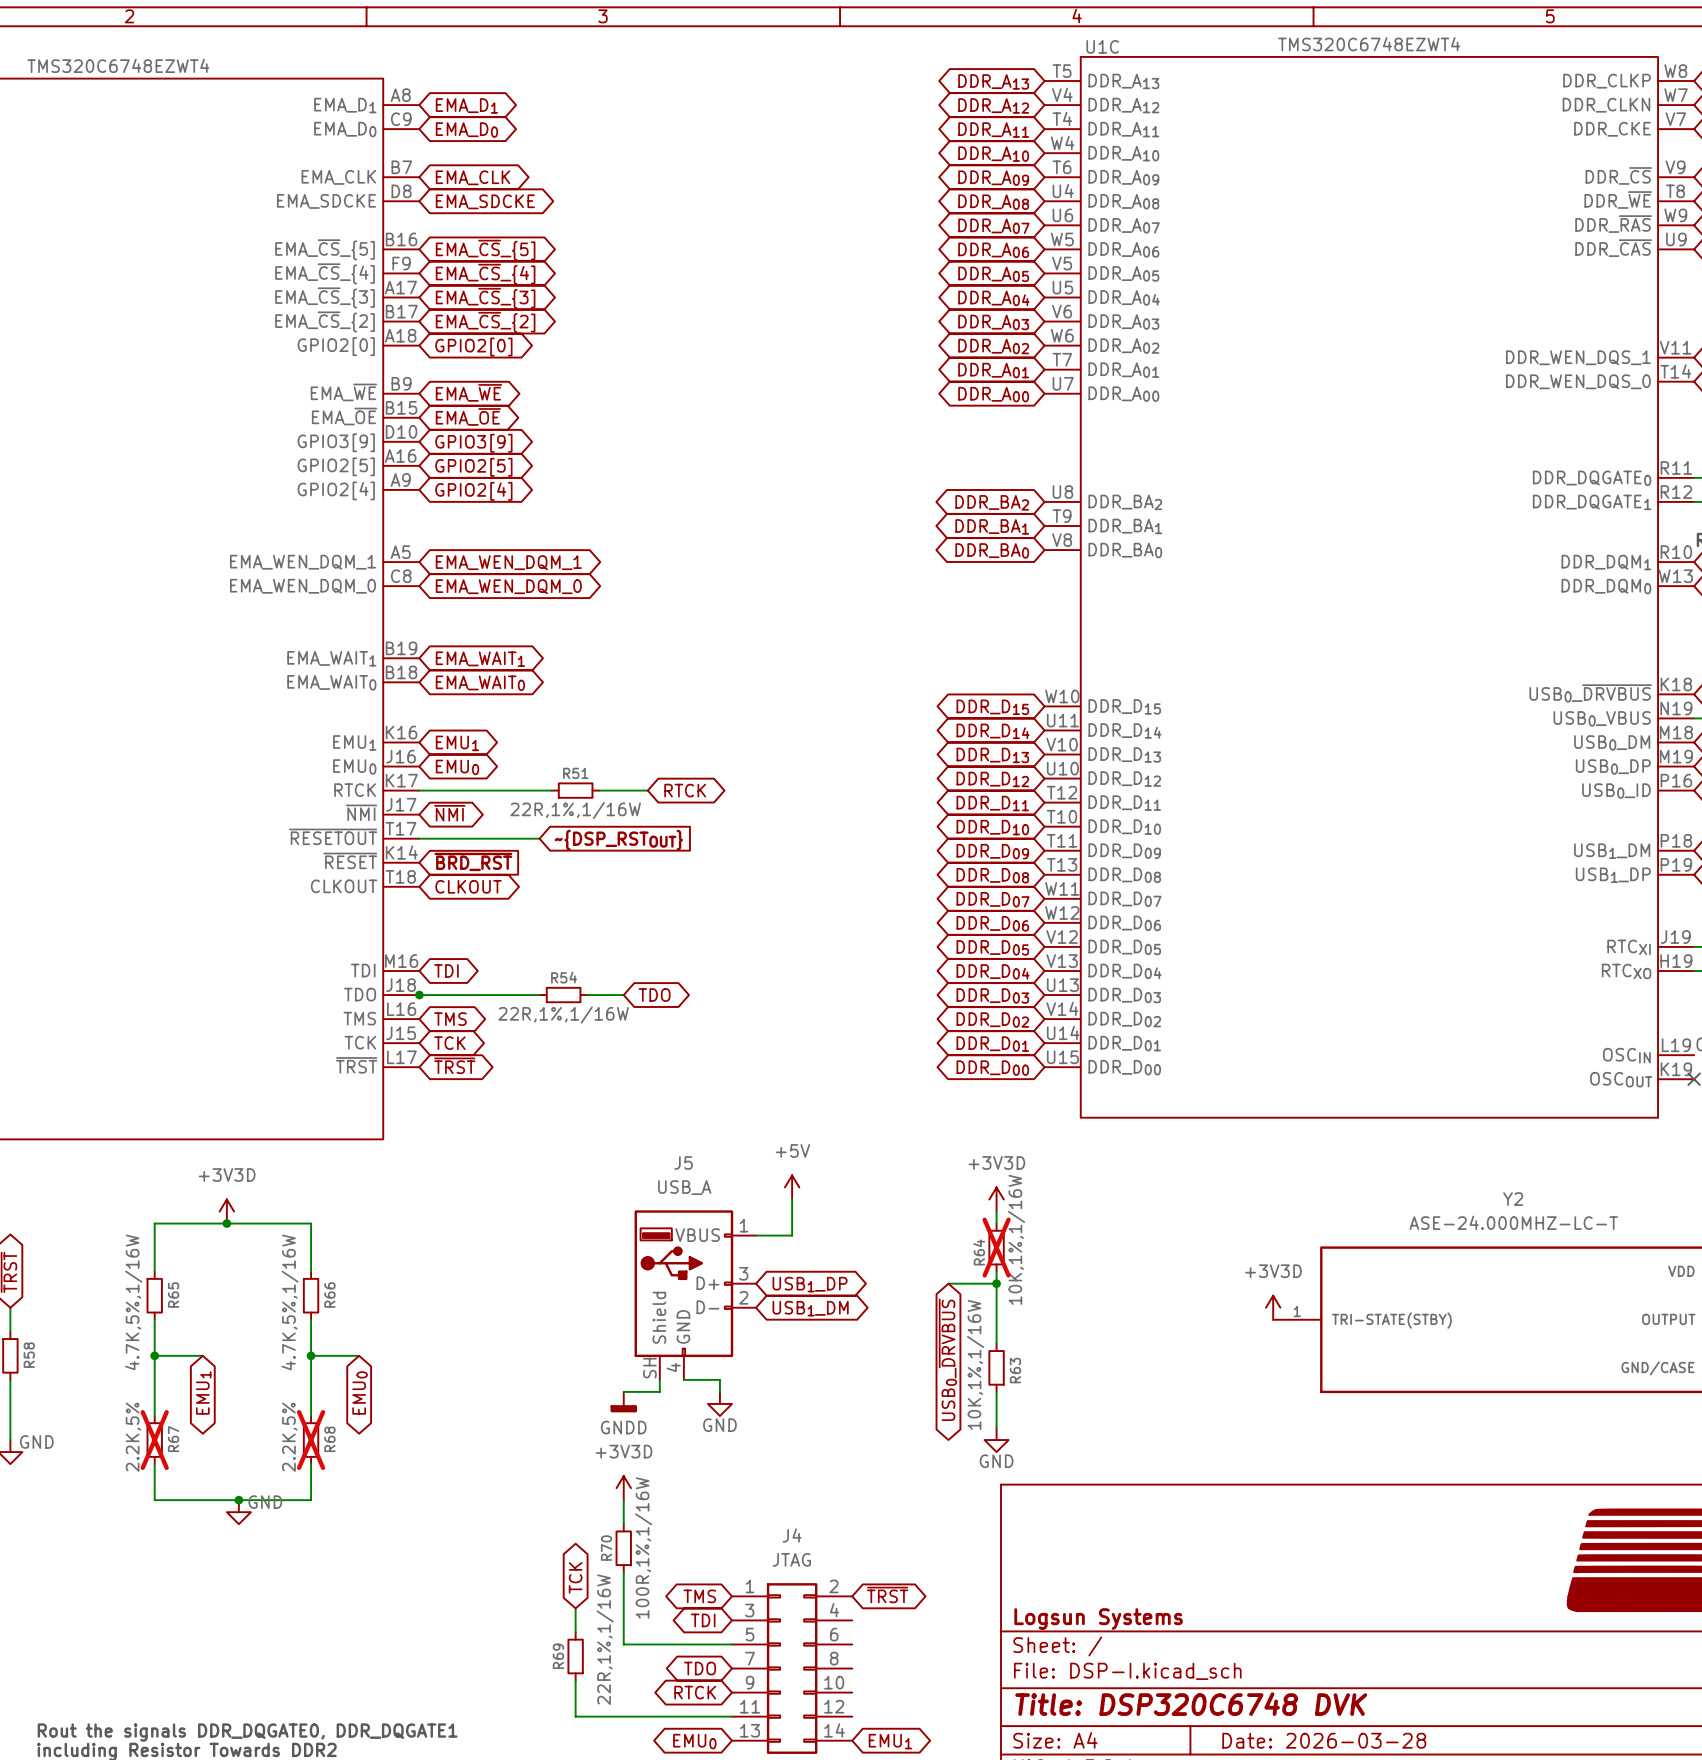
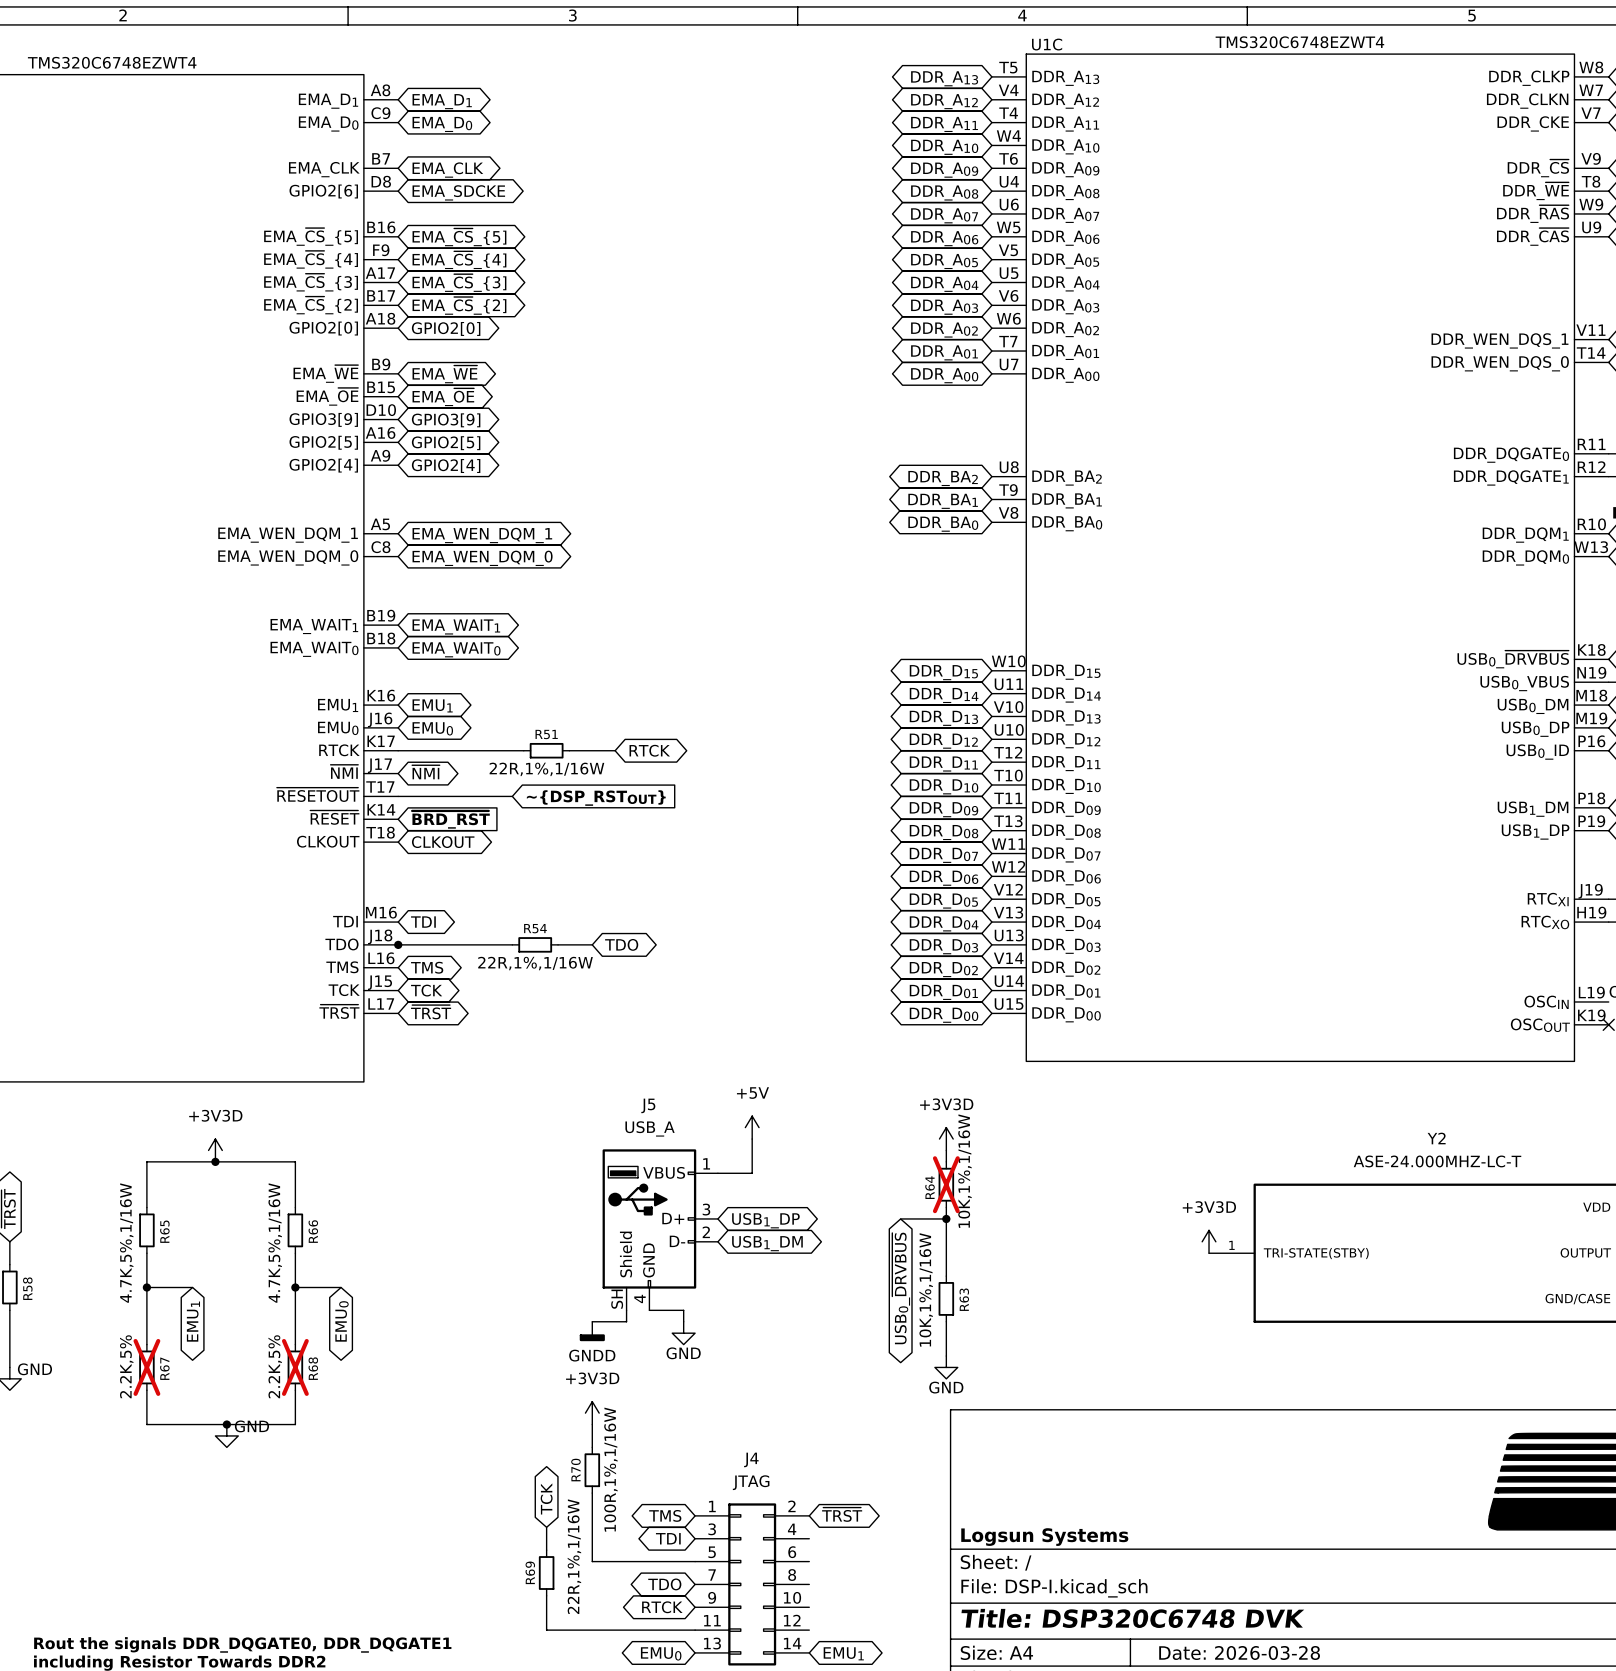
part pin name: EMA_SDCKE (326, 201) -> GPIO2[6] (323, 191)

